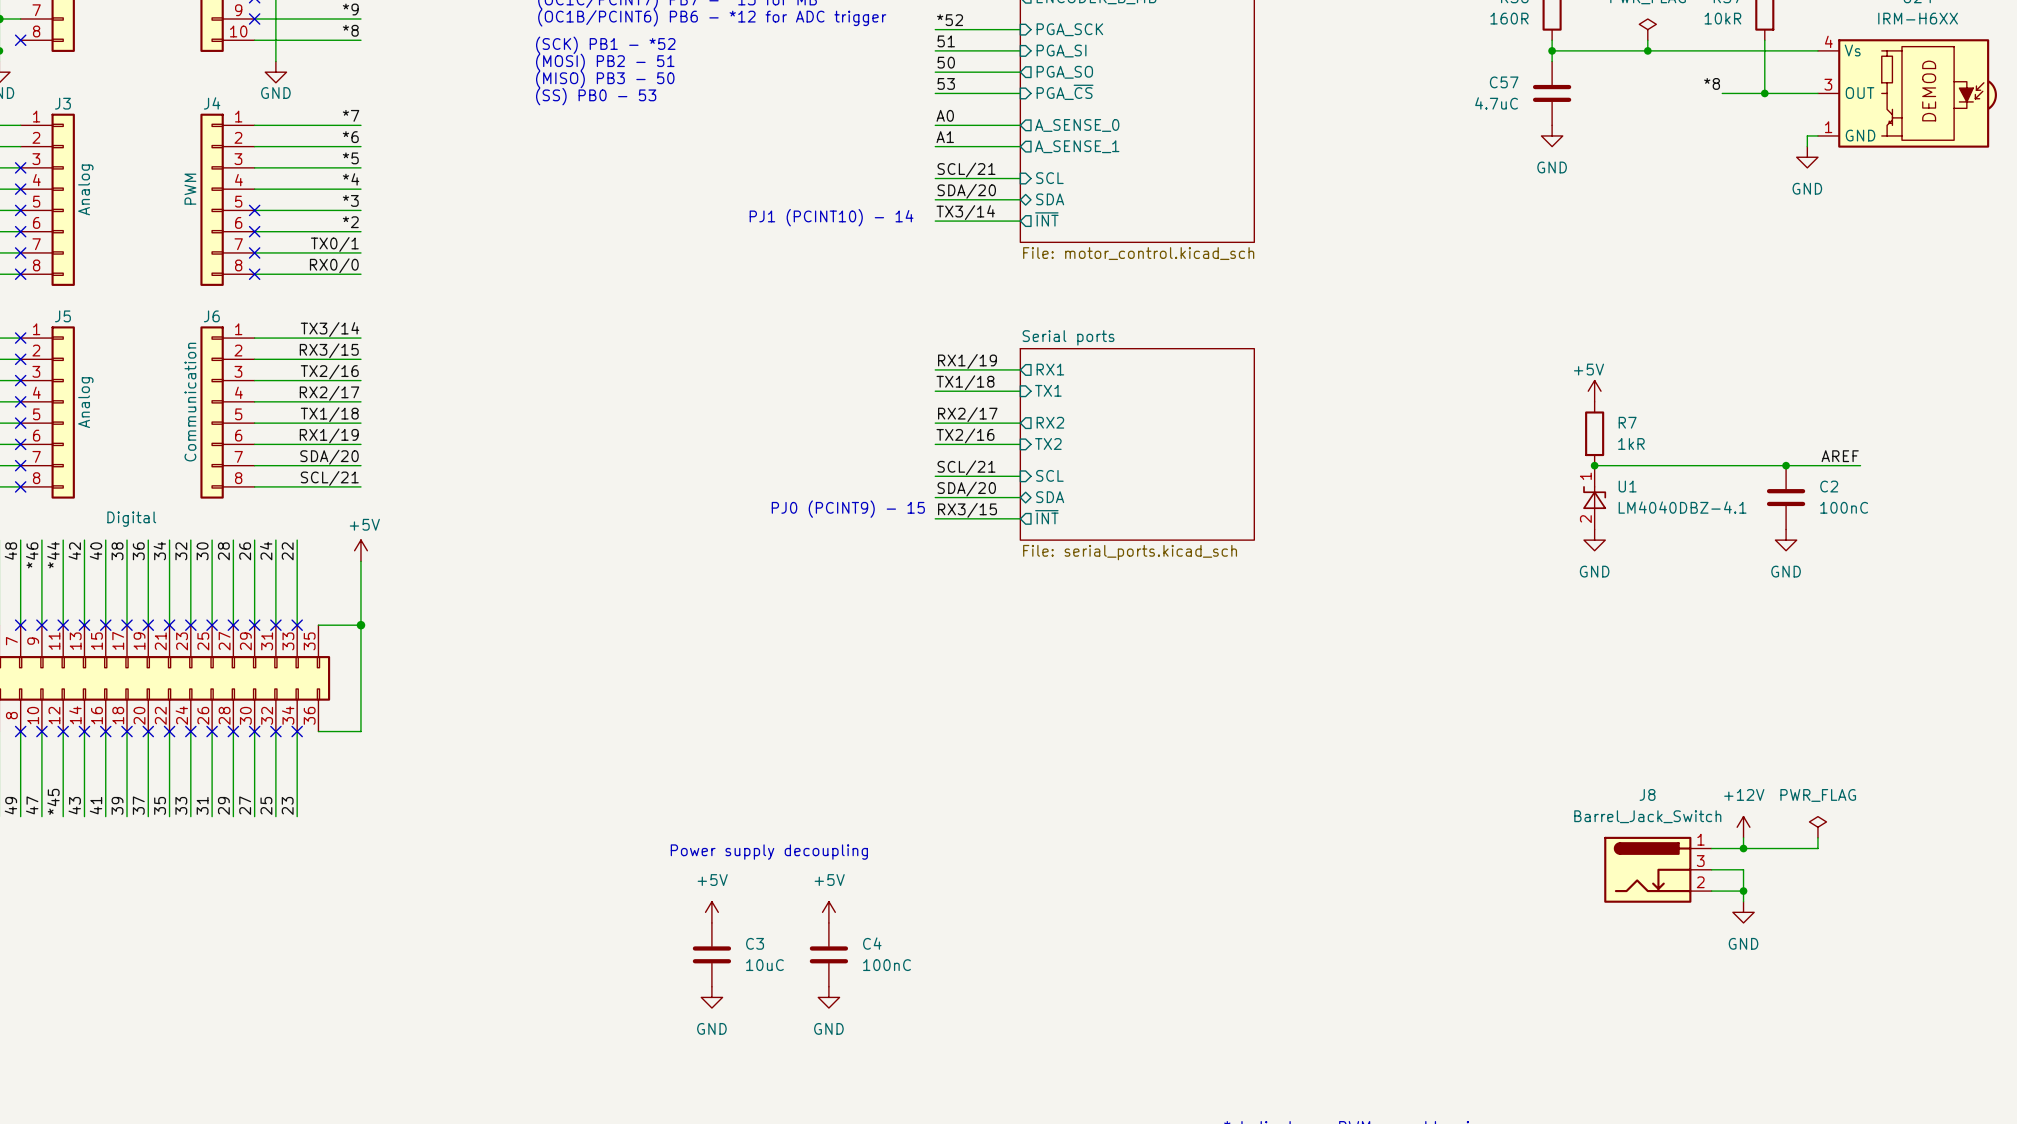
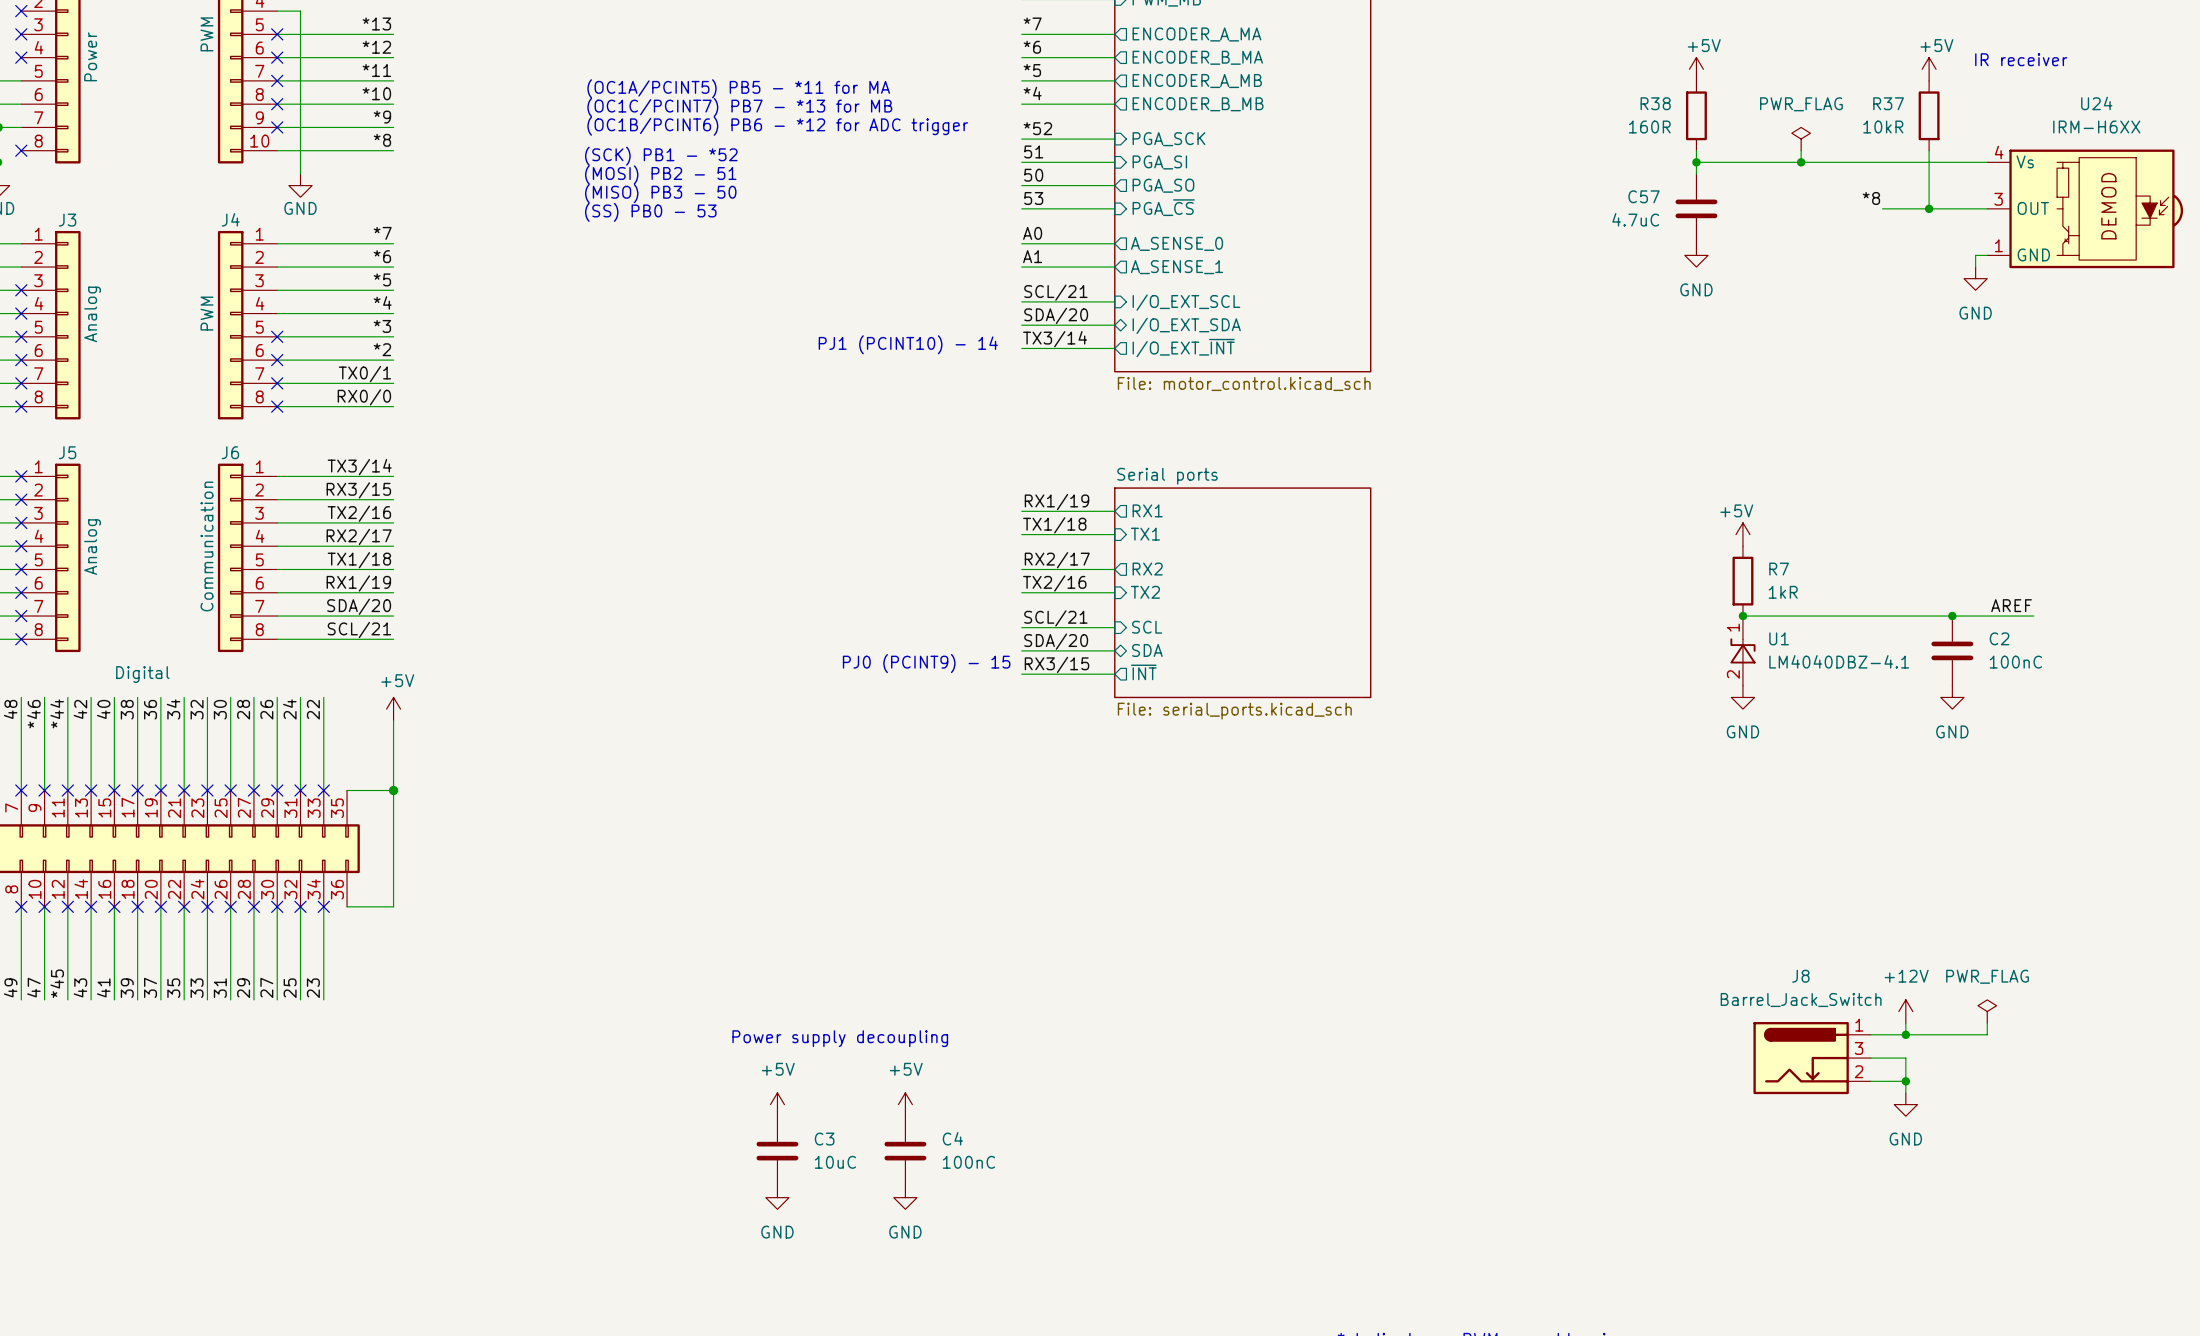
sheet pin: SCL (1049, 178) -> I/O_EXT_SCL (1186, 302)
sheet pin: SDA (1050, 199) -> I/O_EXT_SDA (1186, 325)
sheet pin: ~{INT} (1046, 219) -> I/O_EXT_~{INT} (1183, 348)

